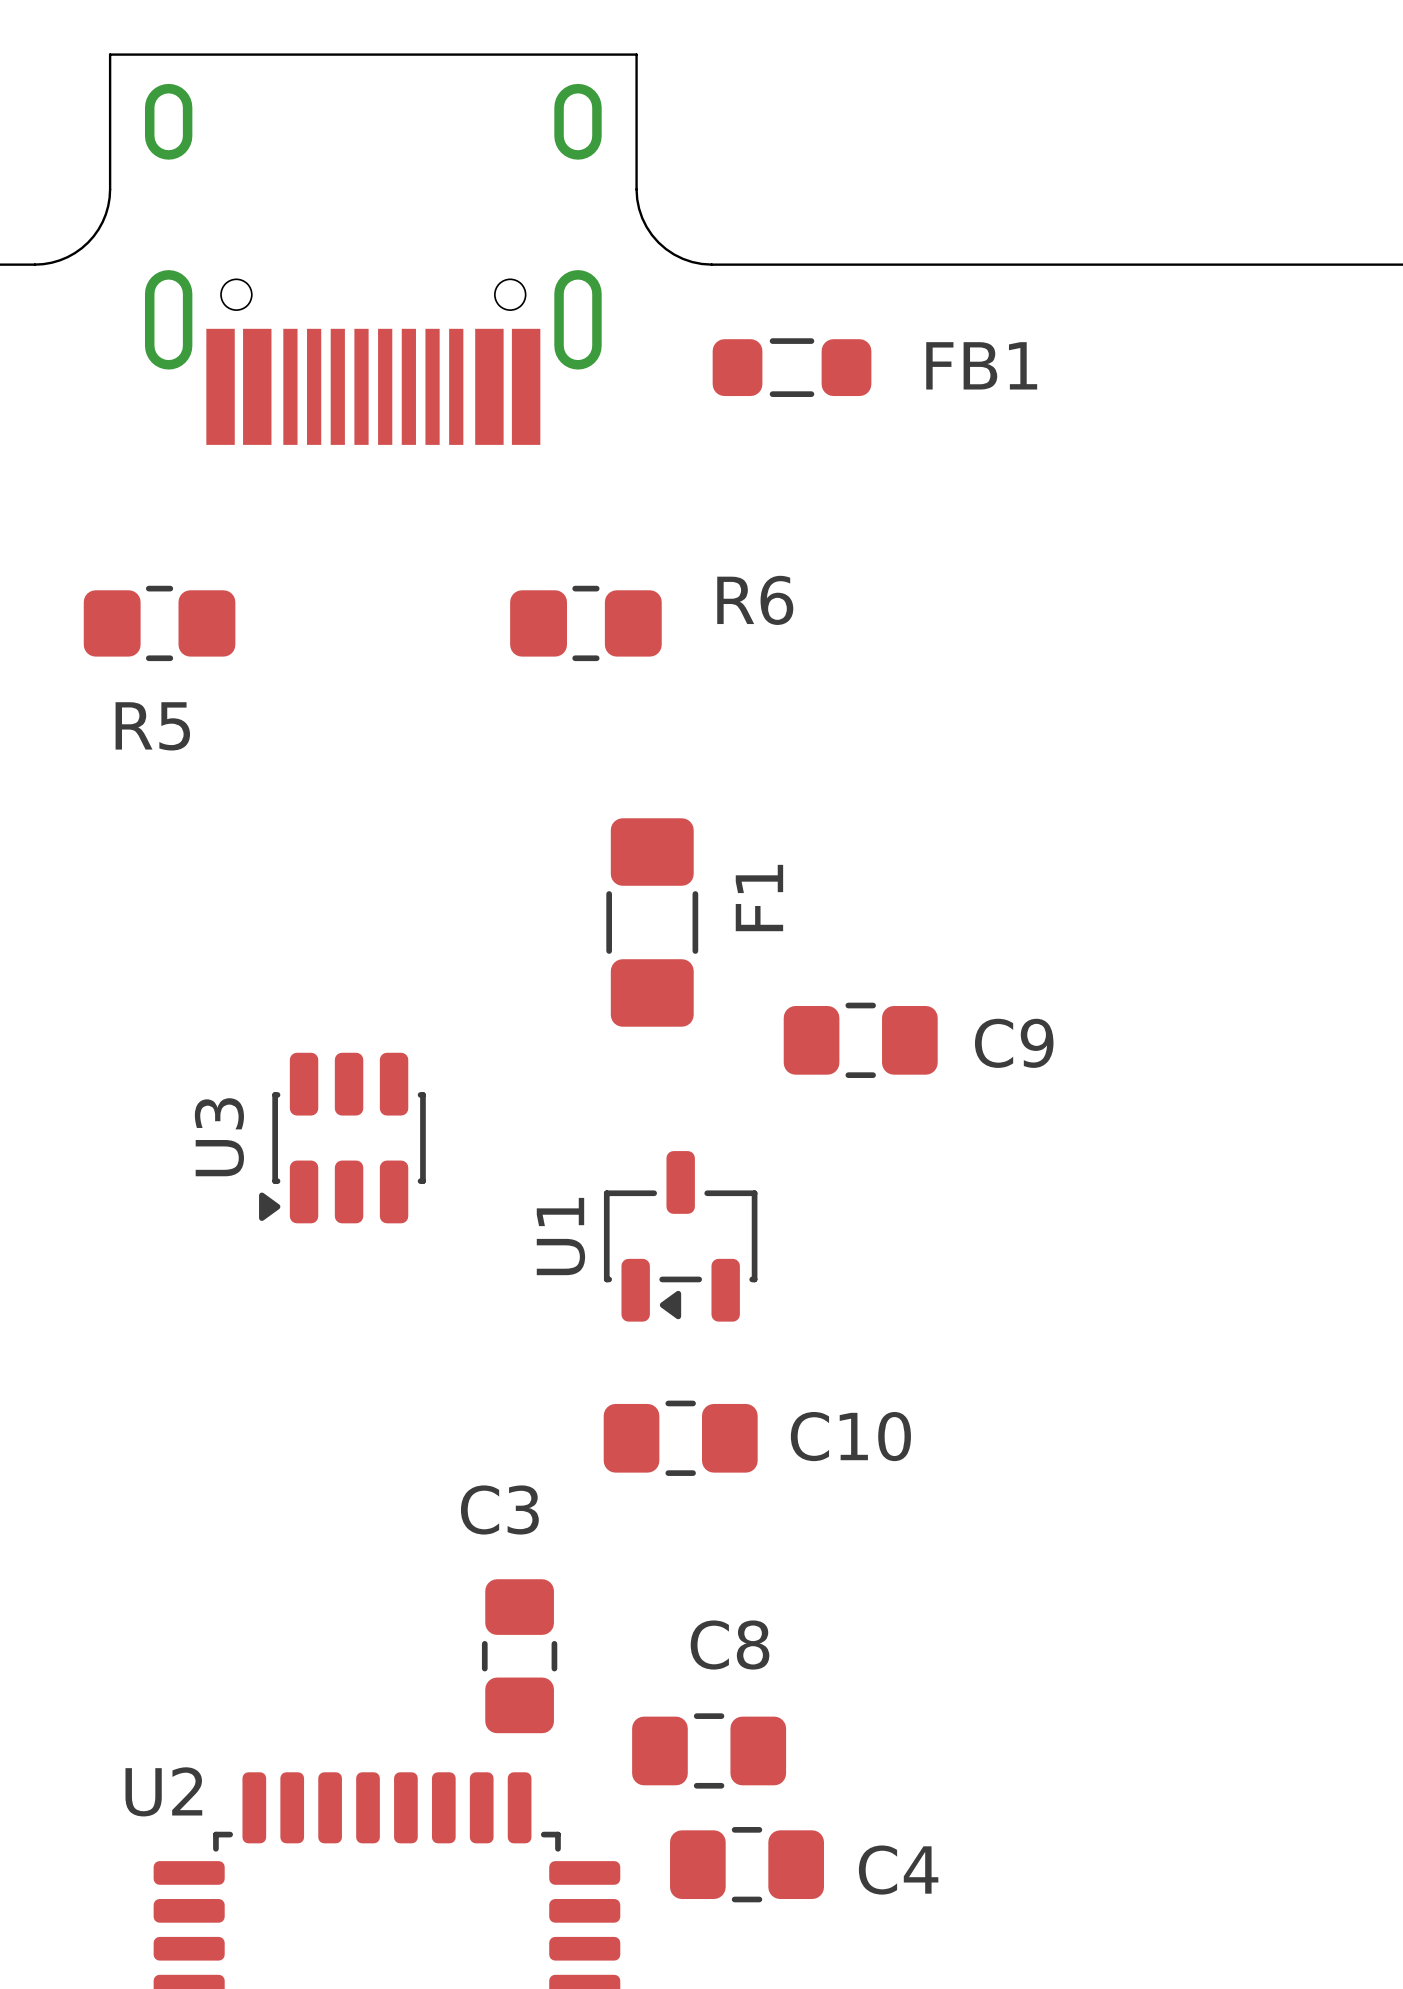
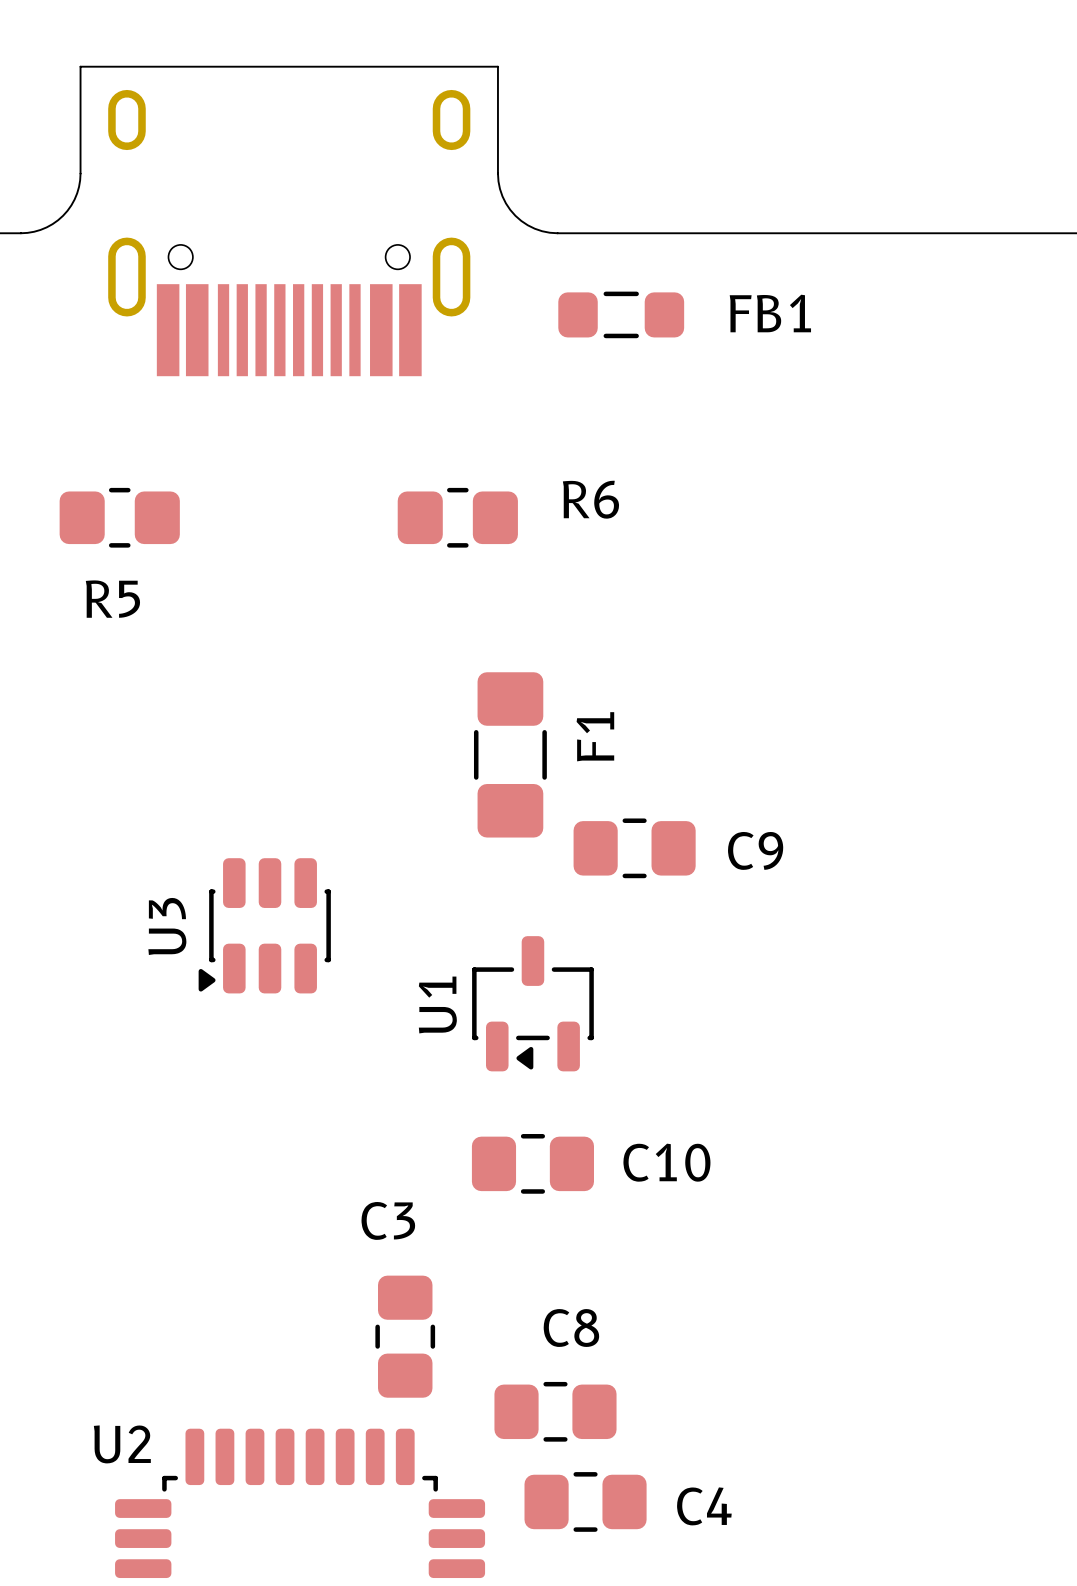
C9 position: (860, 1040) -> (634, 848)

